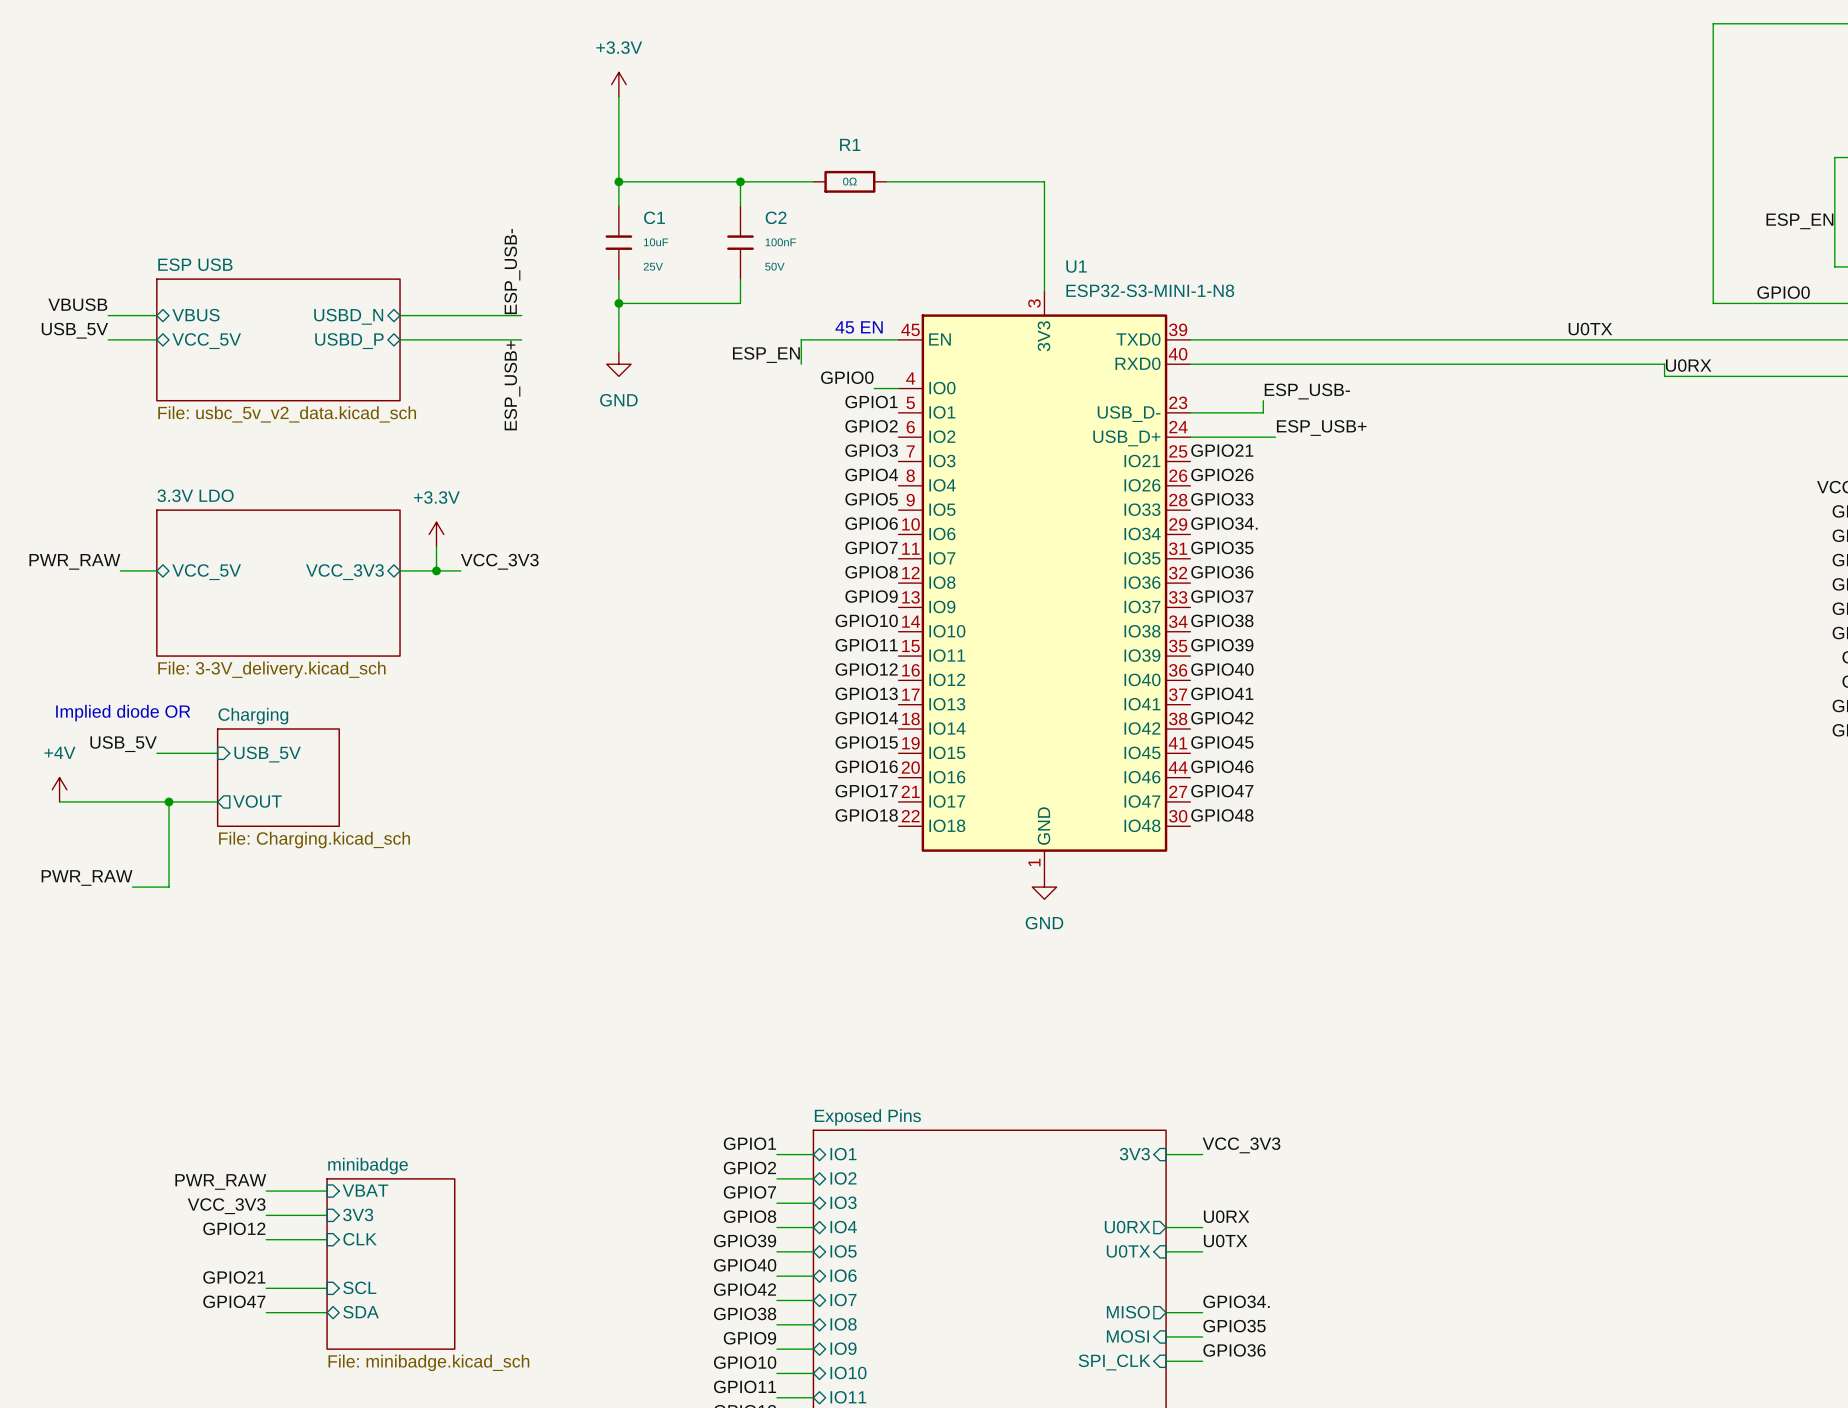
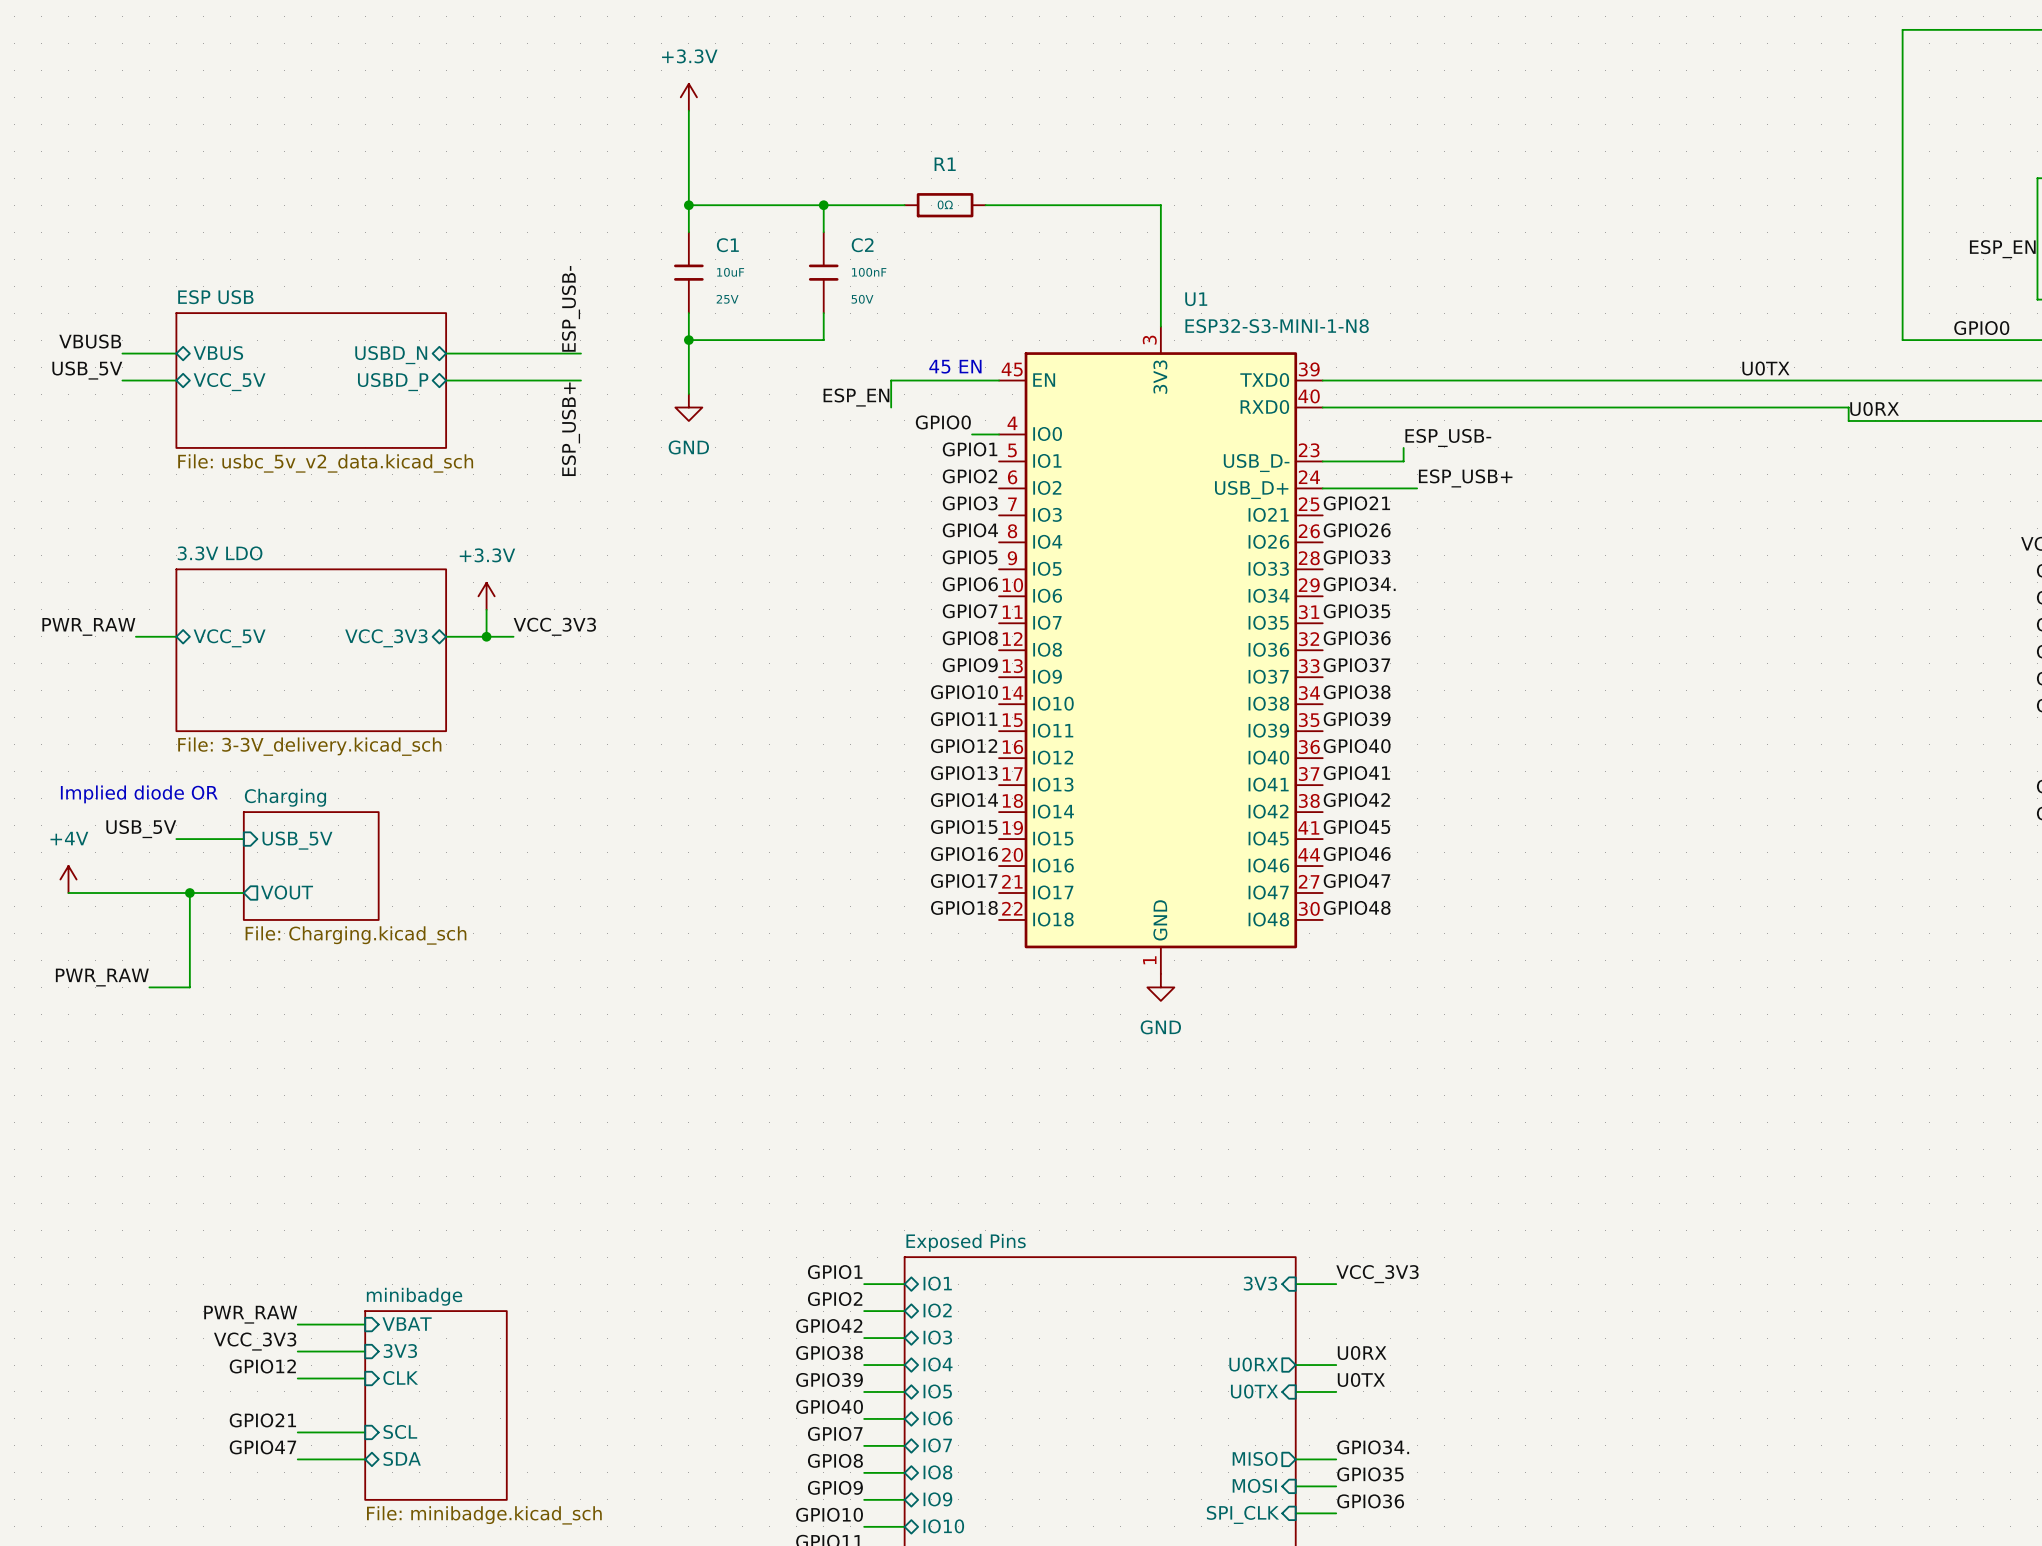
label: GPIO7 (749, 1192) -> GPIO42 (829, 1326)
label: GPIO8 (750, 1216) -> GPIO38 (829, 1352)
label: GPIO42 (745, 1289) -> GPIO7 (835, 1433)
label: GPIO38 (745, 1313) -> GPIO8 (835, 1460)

